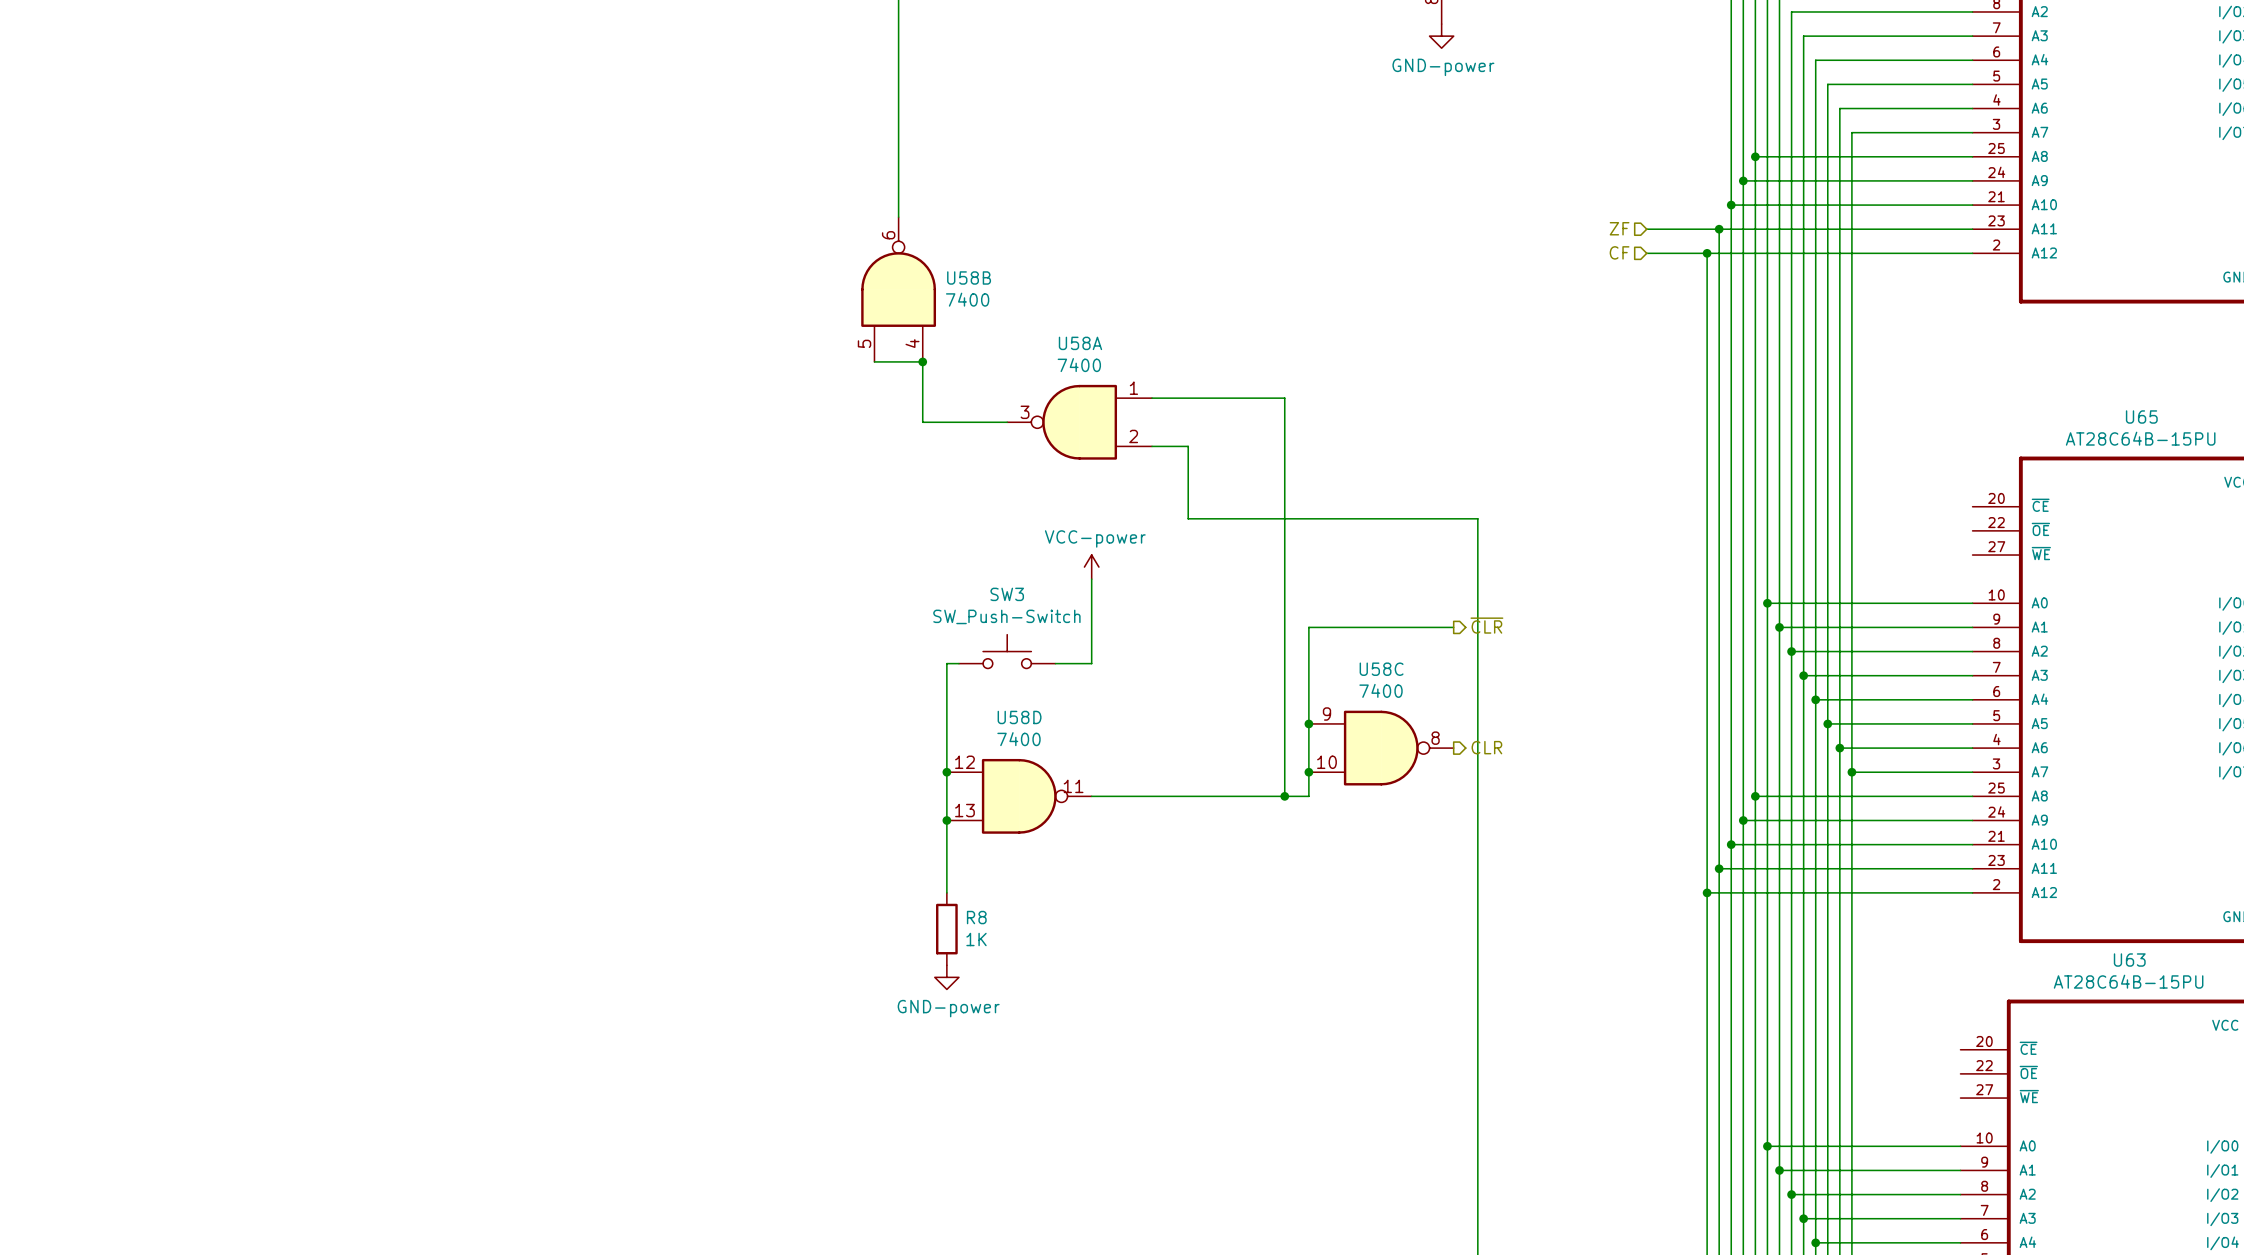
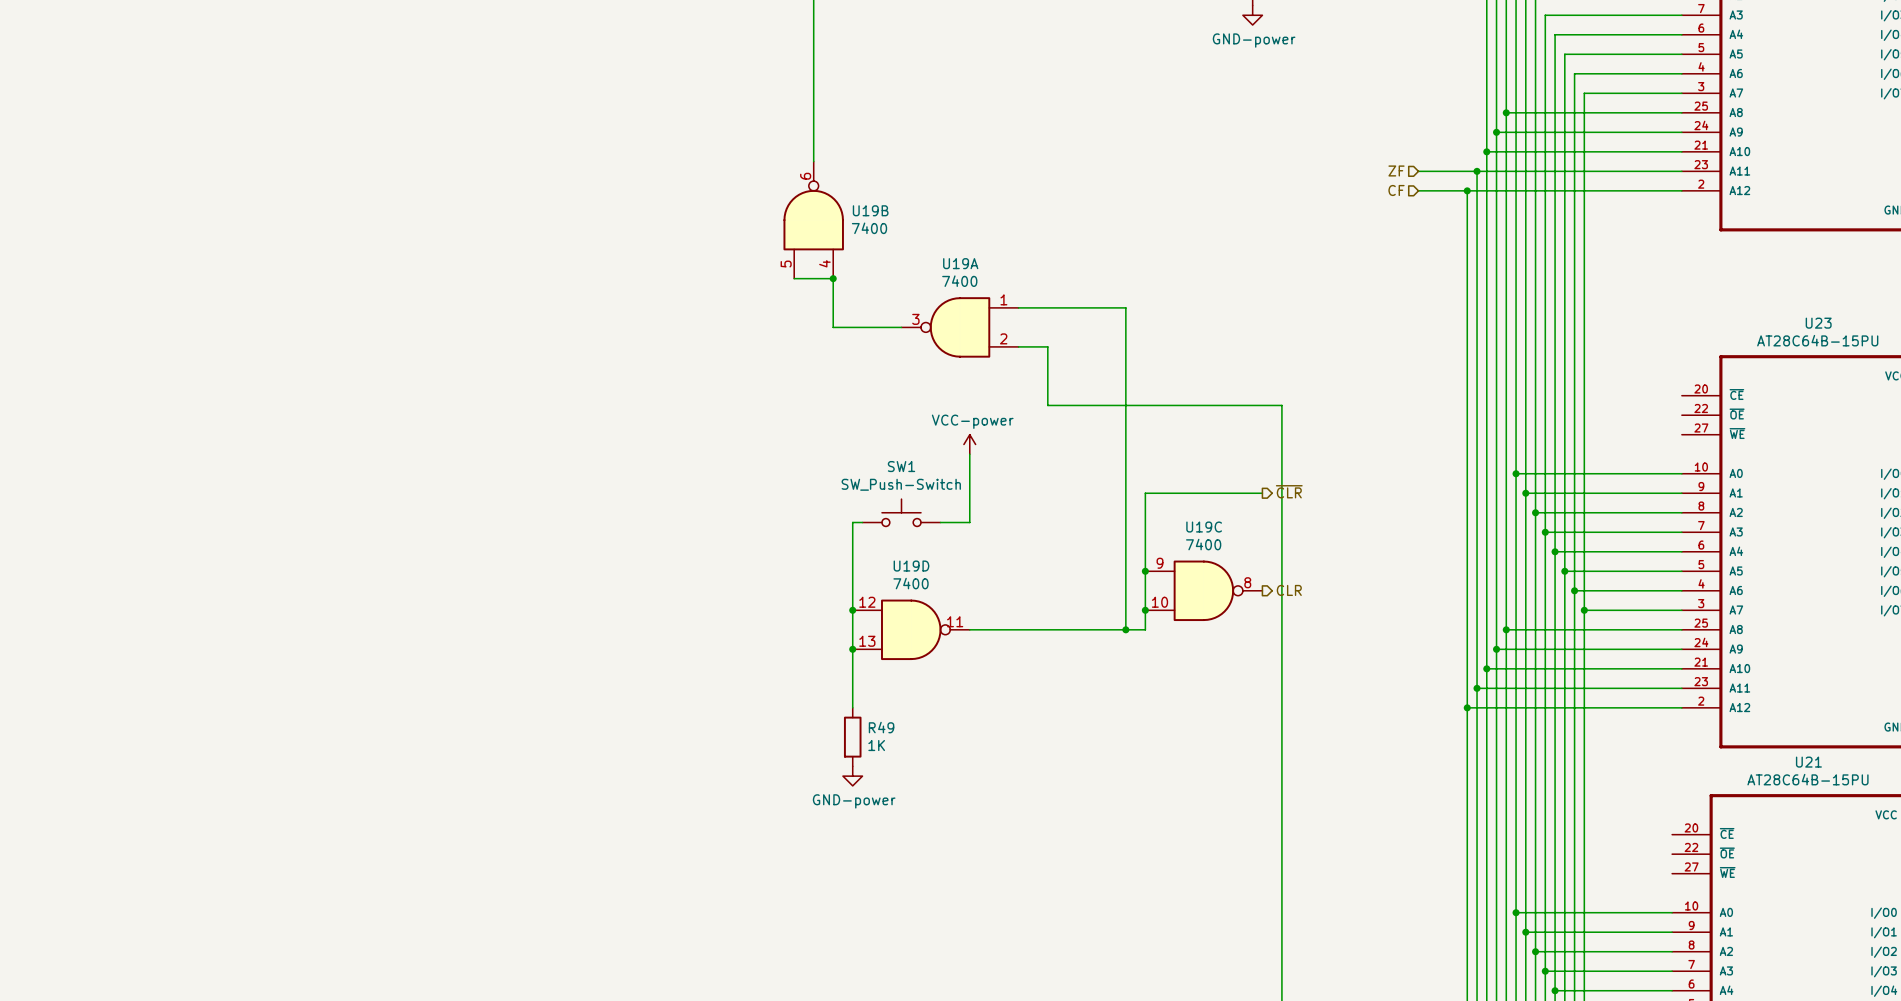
U58B name: U58B (969, 277) -> U19B (870, 210)
U58A name: U58A (1080, 343) -> U19A (960, 263)
U65 name: U65 (2141, 417) -> U23 (1818, 323)
SW3 name: SW3 (1007, 594) -> SW1 (901, 466)
U58C name: U58C (1381, 669) -> U19C (1204, 527)
U58D name: U58D (1019, 717) -> U19D (911, 566)
R8 name: R8 (976, 917) -> R49 (881, 727)
U63 name: U63 (2129, 960) -> U21 (1808, 762)

